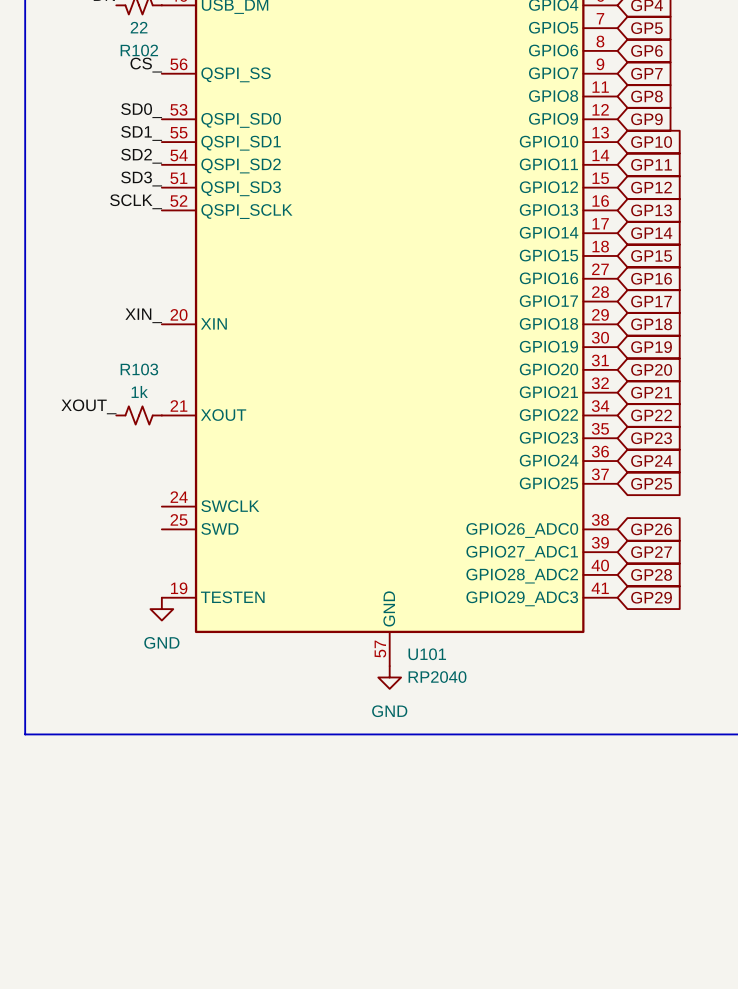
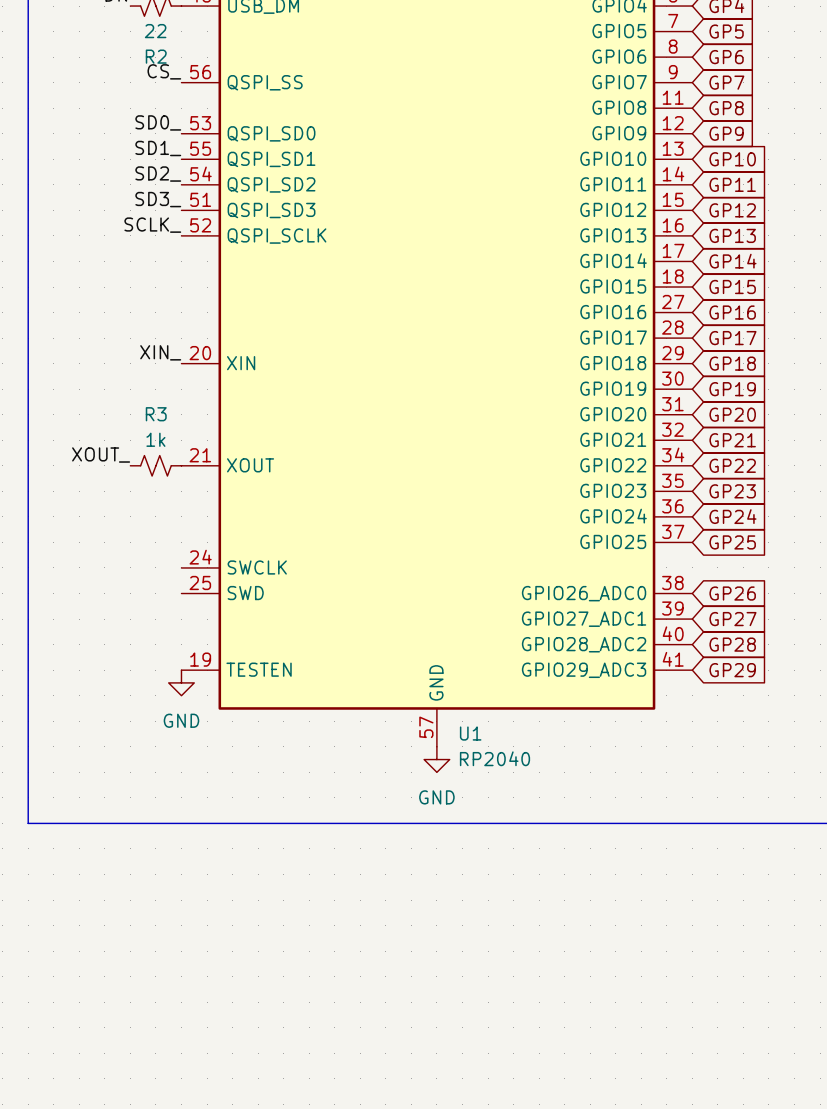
R102 name: R102 (139, 50) -> R2 (156, 56)
R103 name: R103 (139, 369) -> R3 (156, 414)
U101 name: U101 (427, 654) -> U1 (470, 733)

